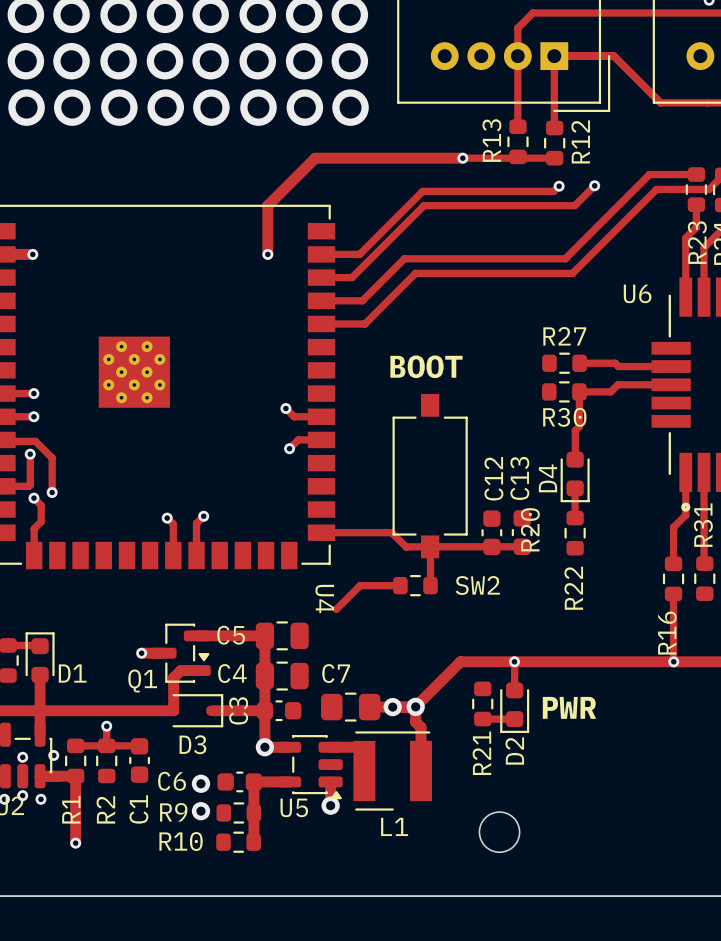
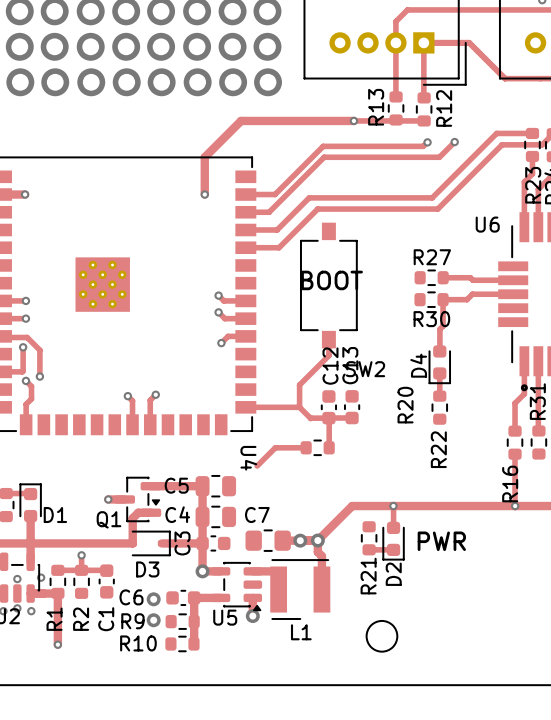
track: none -> (218, 295) (223, 300) (245, 300)
via: none -> (218, 295)
track: none -> (328, 339) (328, 355) (299, 384) (299, 407)
SW2 position: (430, 476) -> (328, 285)
C12 position: (491, 532) -> (328, 407)
C13 position: (522, 532) -> (352, 407)
track: (430, 546) (522, 546) -> (329, 418) (352, 418)

